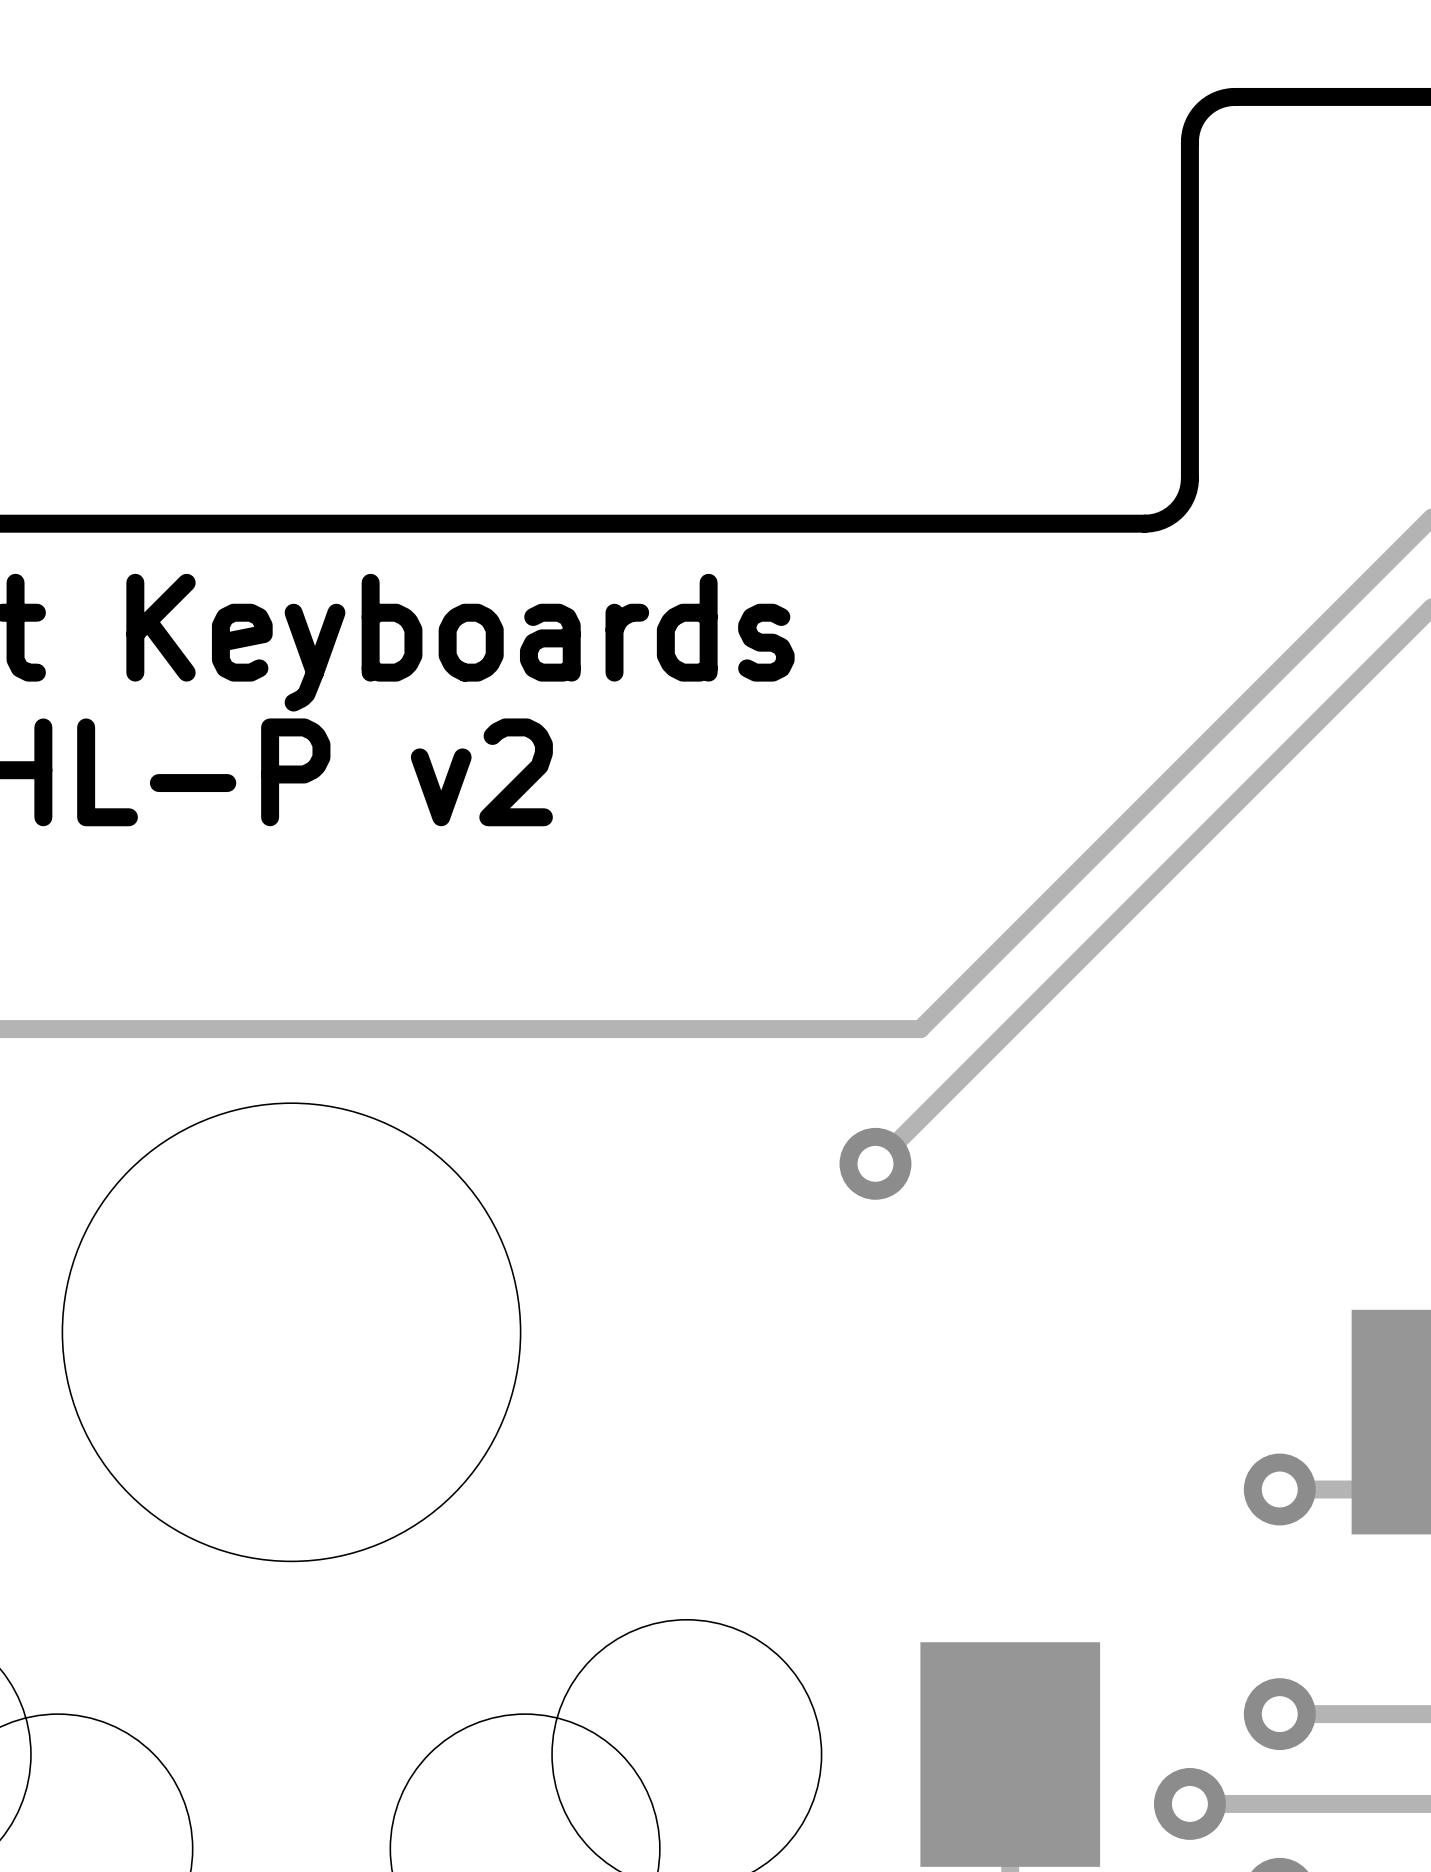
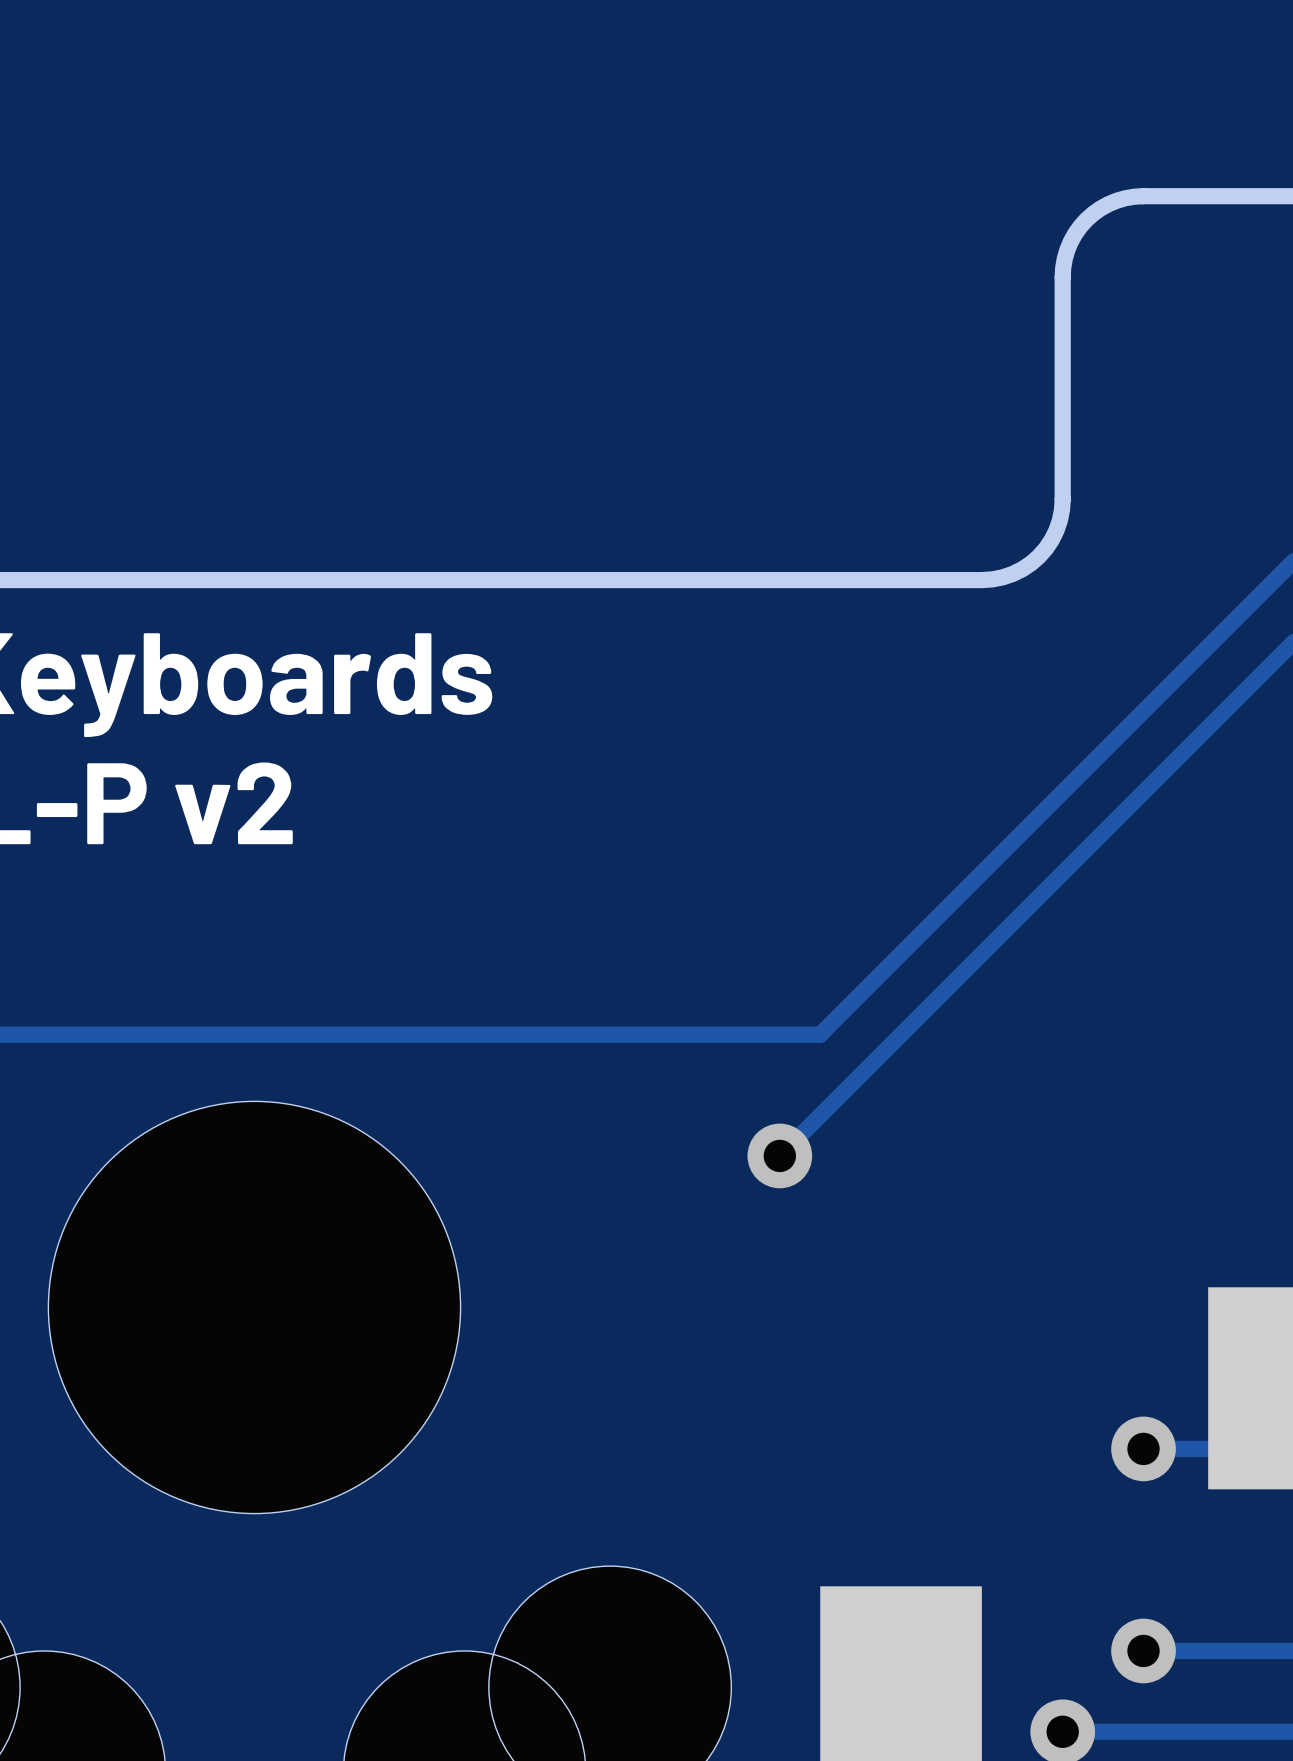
board edge: (1279, 96) (1224, 98) (1215, 101) (1203, 110) (1194, 122) (1191, 131) (1189, 186) -> (1143, 196) (1116, 200) (1100, 208) (1086, 219) (1070, 241) (1064, 259) (1062, 277)
board edge: (1189, 433) (1189, 484) (1183, 501) (1176, 510) (1162, 520) (1150, 523) (1100, 523) -> (1062, 499) (1056, 530) (1039, 556) (1012, 573) (981, 580)

